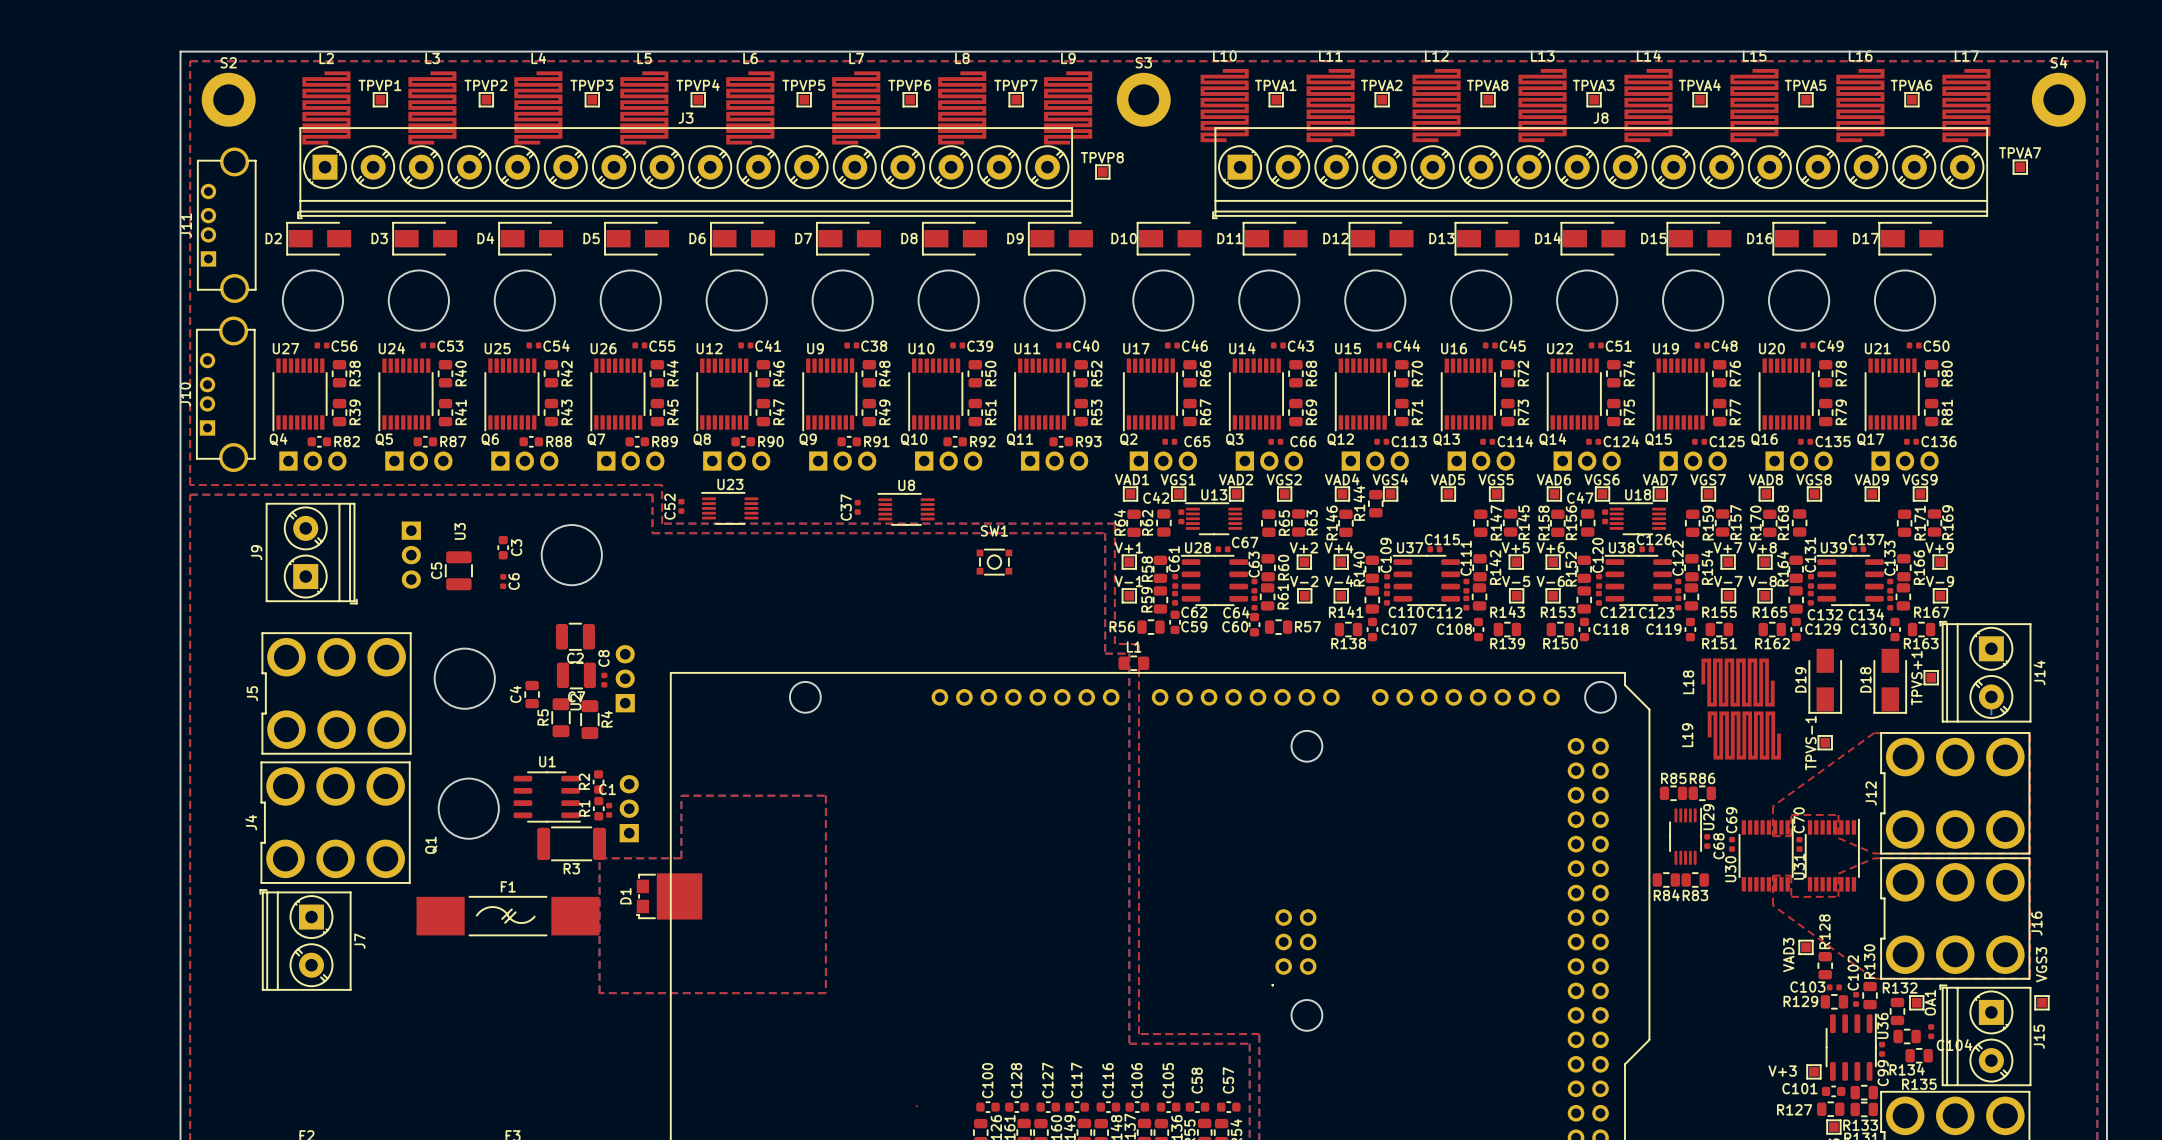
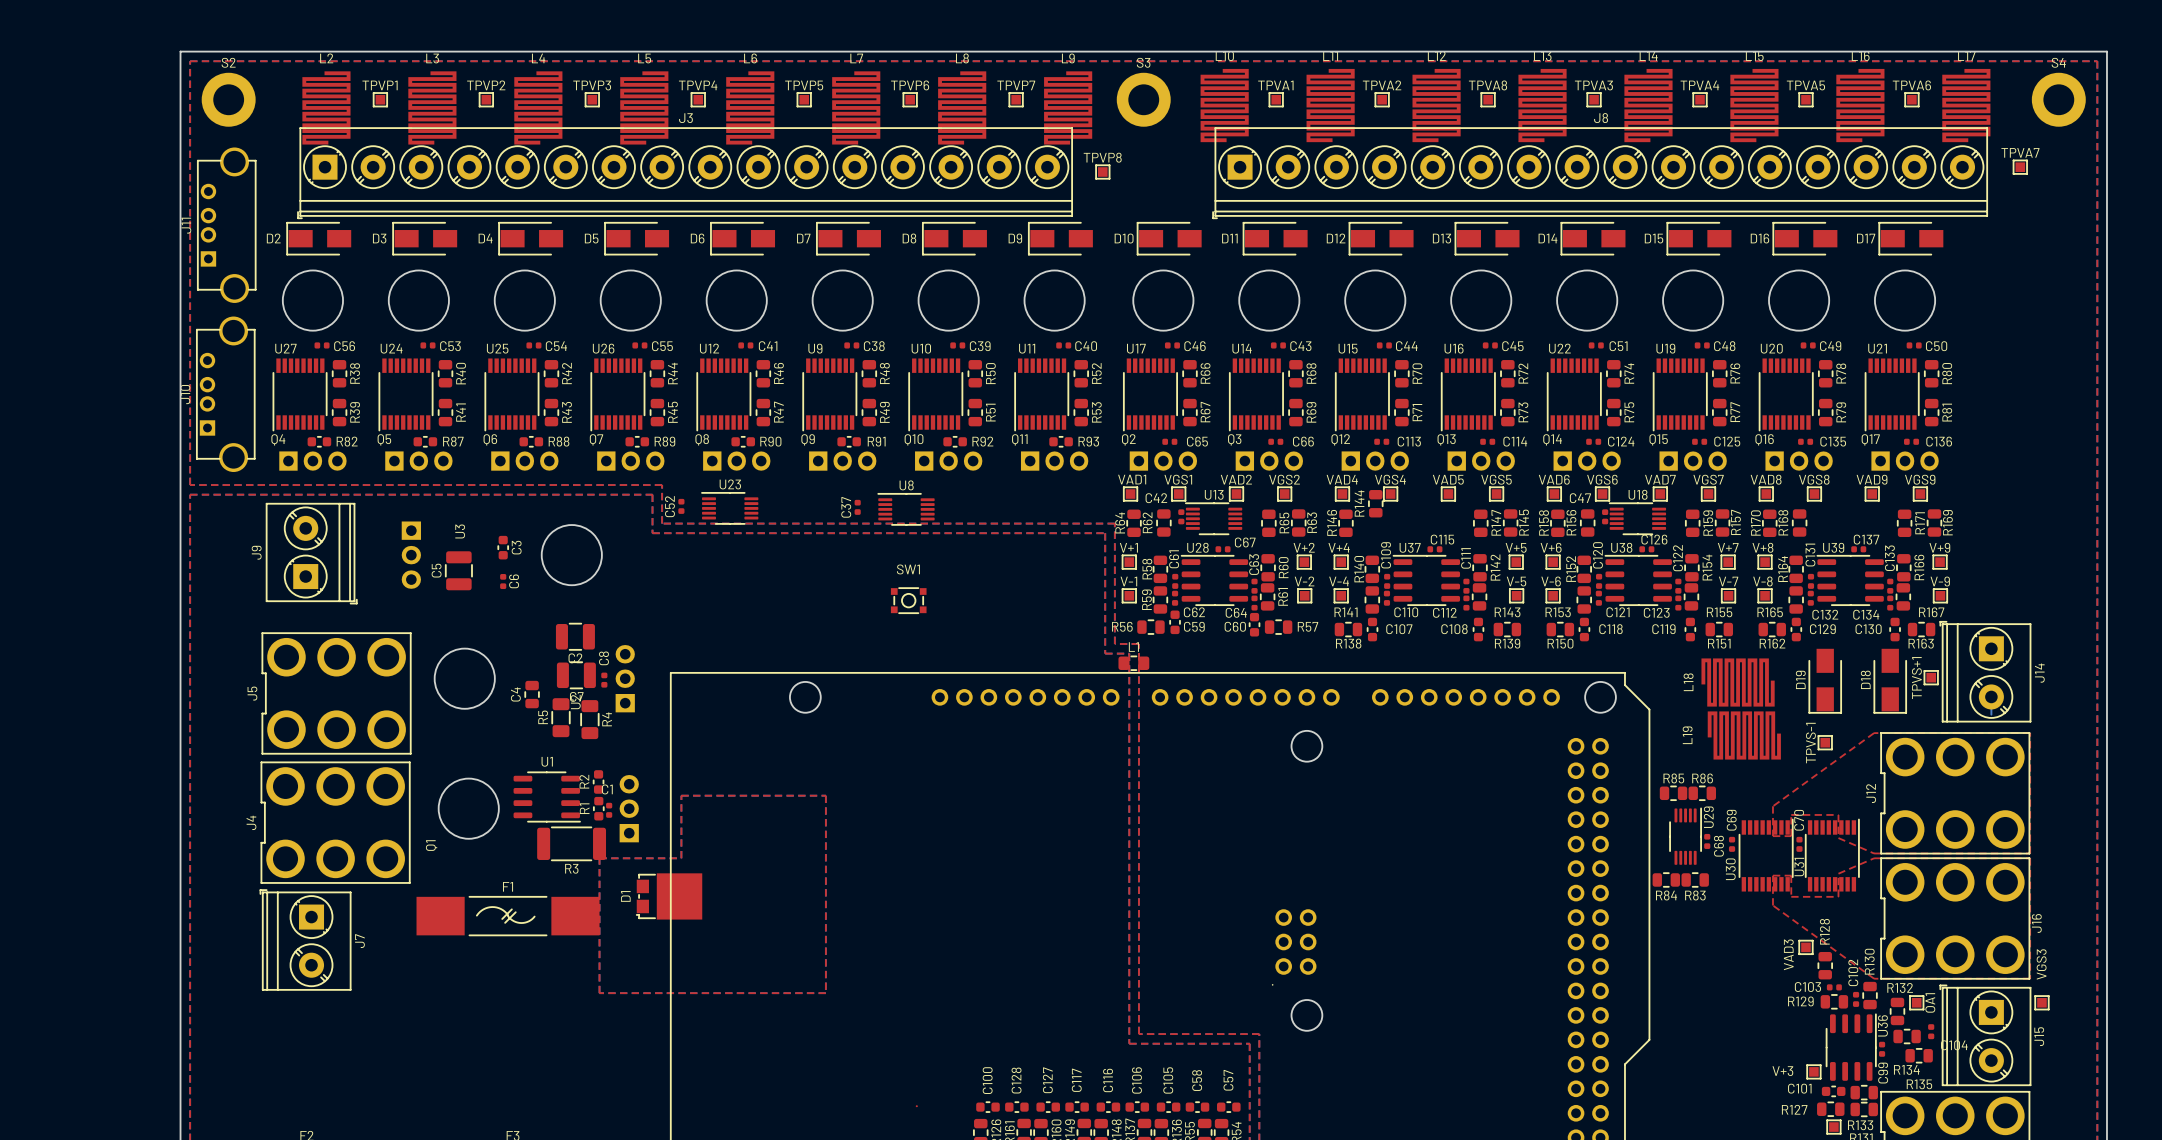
SW1 position: (994, 562) -> (908, 600)

